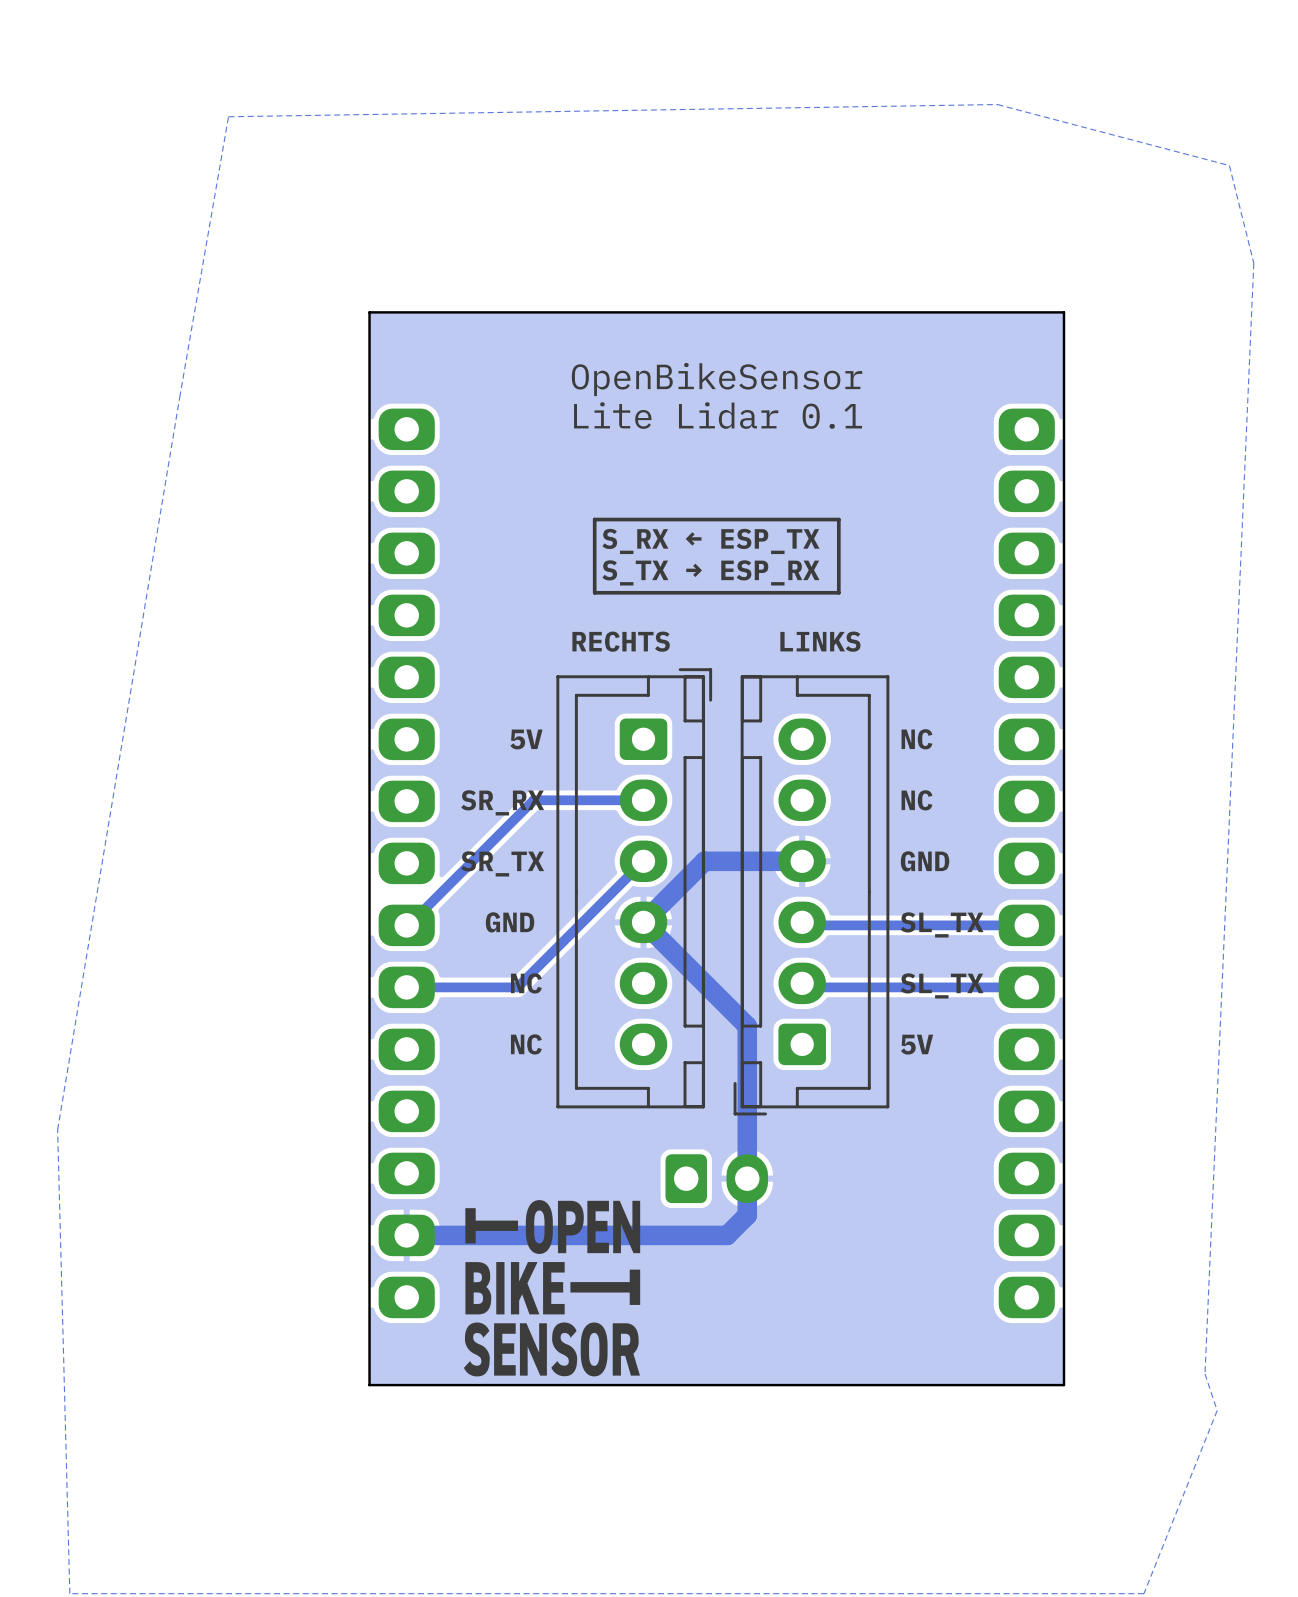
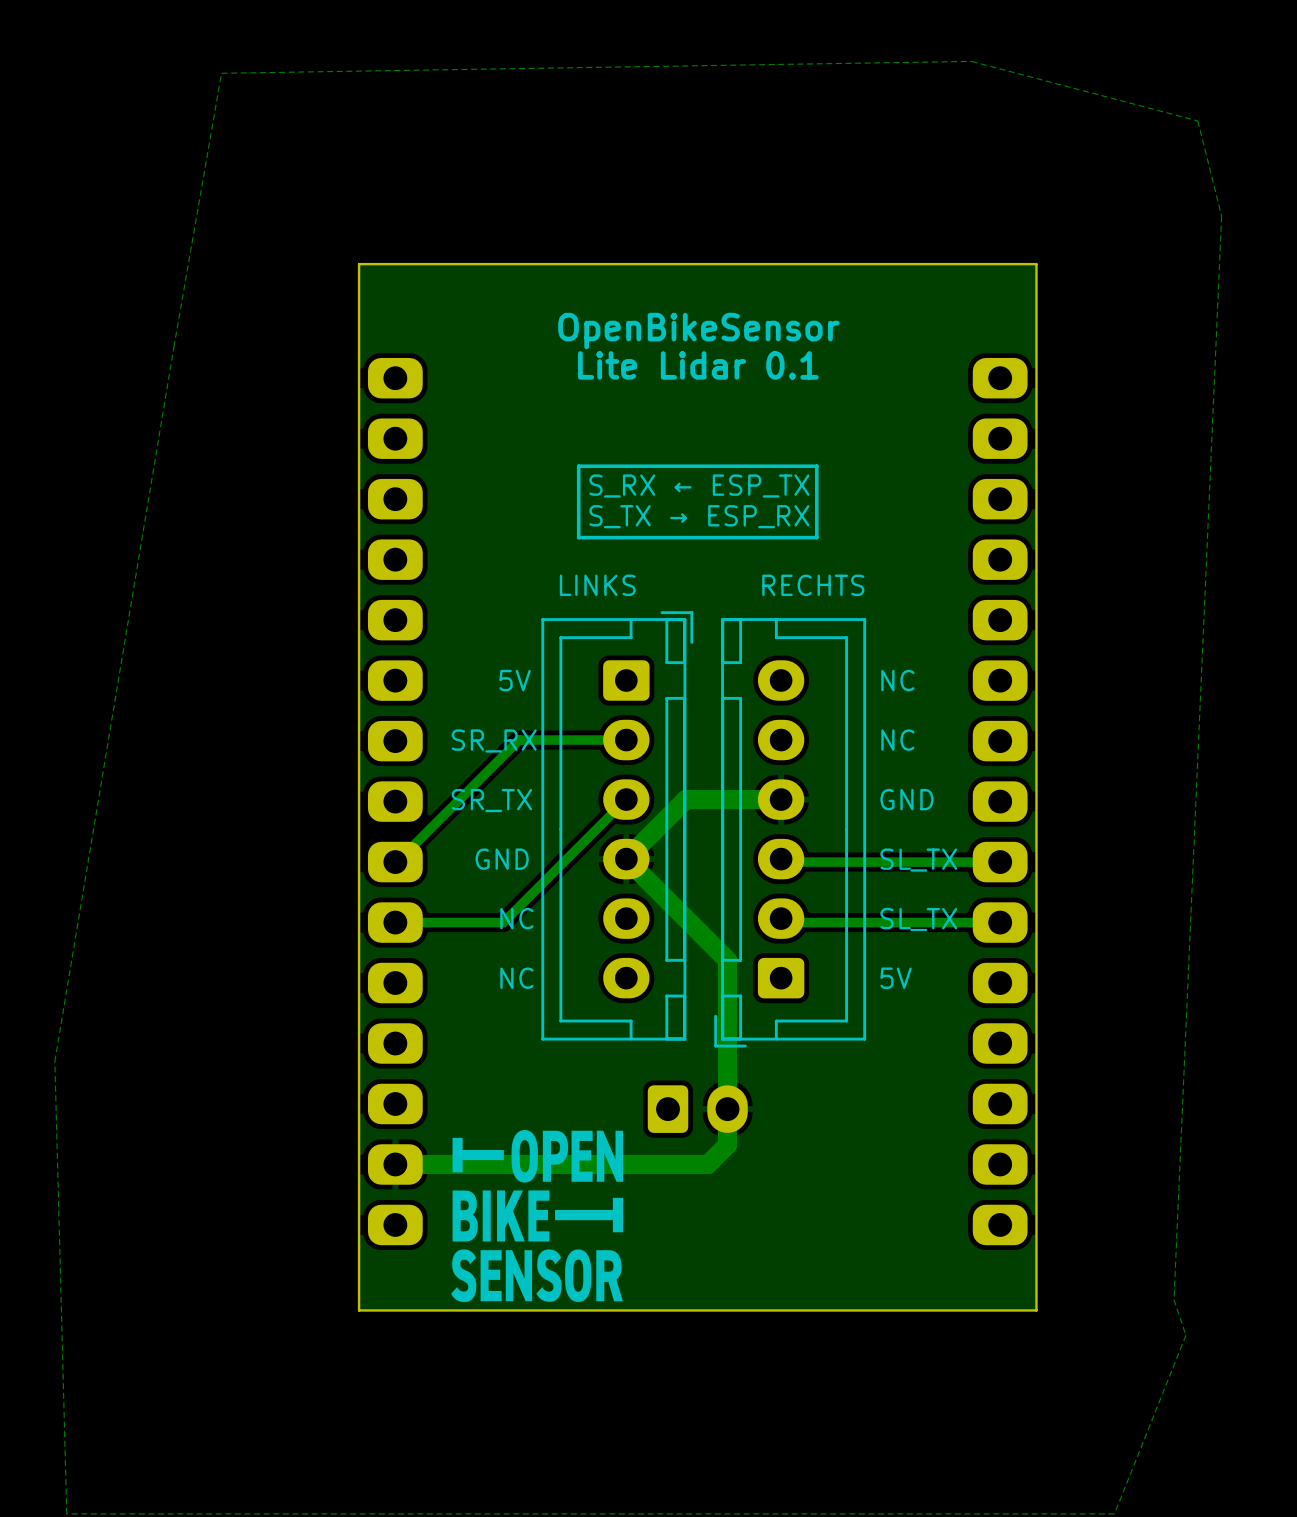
text: RECHTS (621, 641) -> LINKS (597, 585)
text: LINKS (820, 641) -> RECHTS (813, 585)

